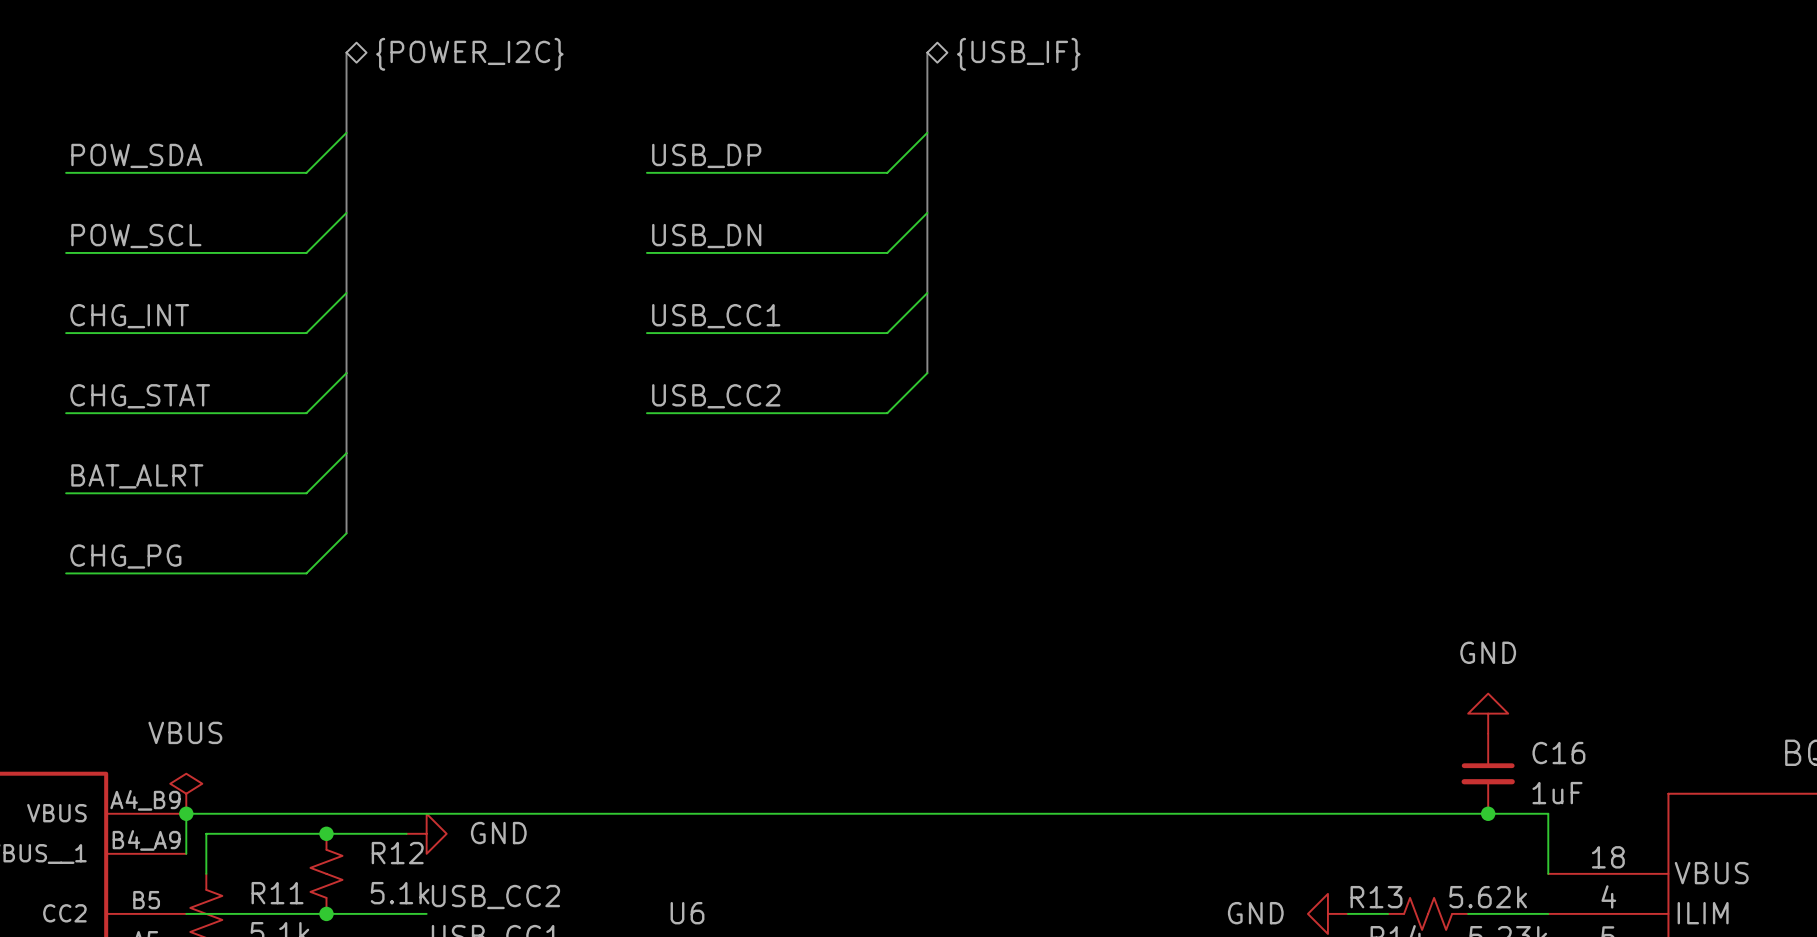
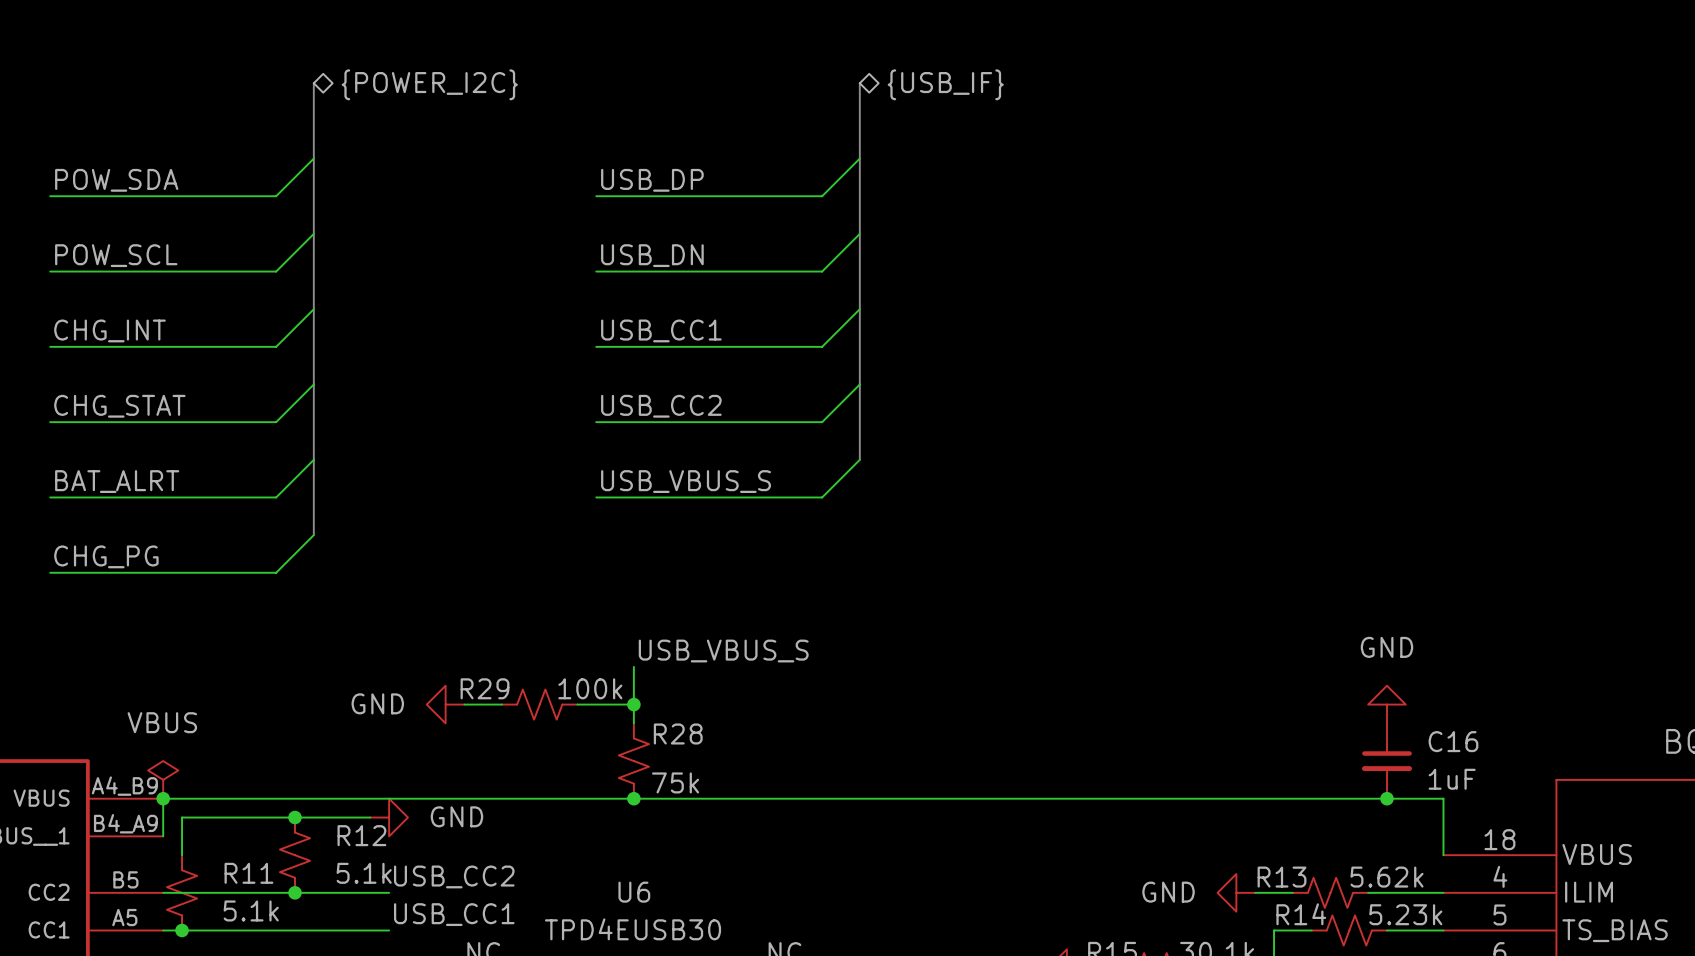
bus: none -> (859, 384) (859, 459)
wire: none -> (859, 459) (822, 497) (596, 497)
label: none -> USB_VBUS_S (686, 481)
label: none -> USB_VBUS_S (723, 651)
wire: none -> (633, 666) (633, 723)
power symbol: none -> GND (445, 704)
wire: none -> (464, 704) (502, 704)
R29: none -> 100k (539, 704)
wire: none -> (577, 704) (633, 704)
junction: none -> (633, 704)
R28: none -> 75k (633, 761)
junction: none -> (633, 798)

